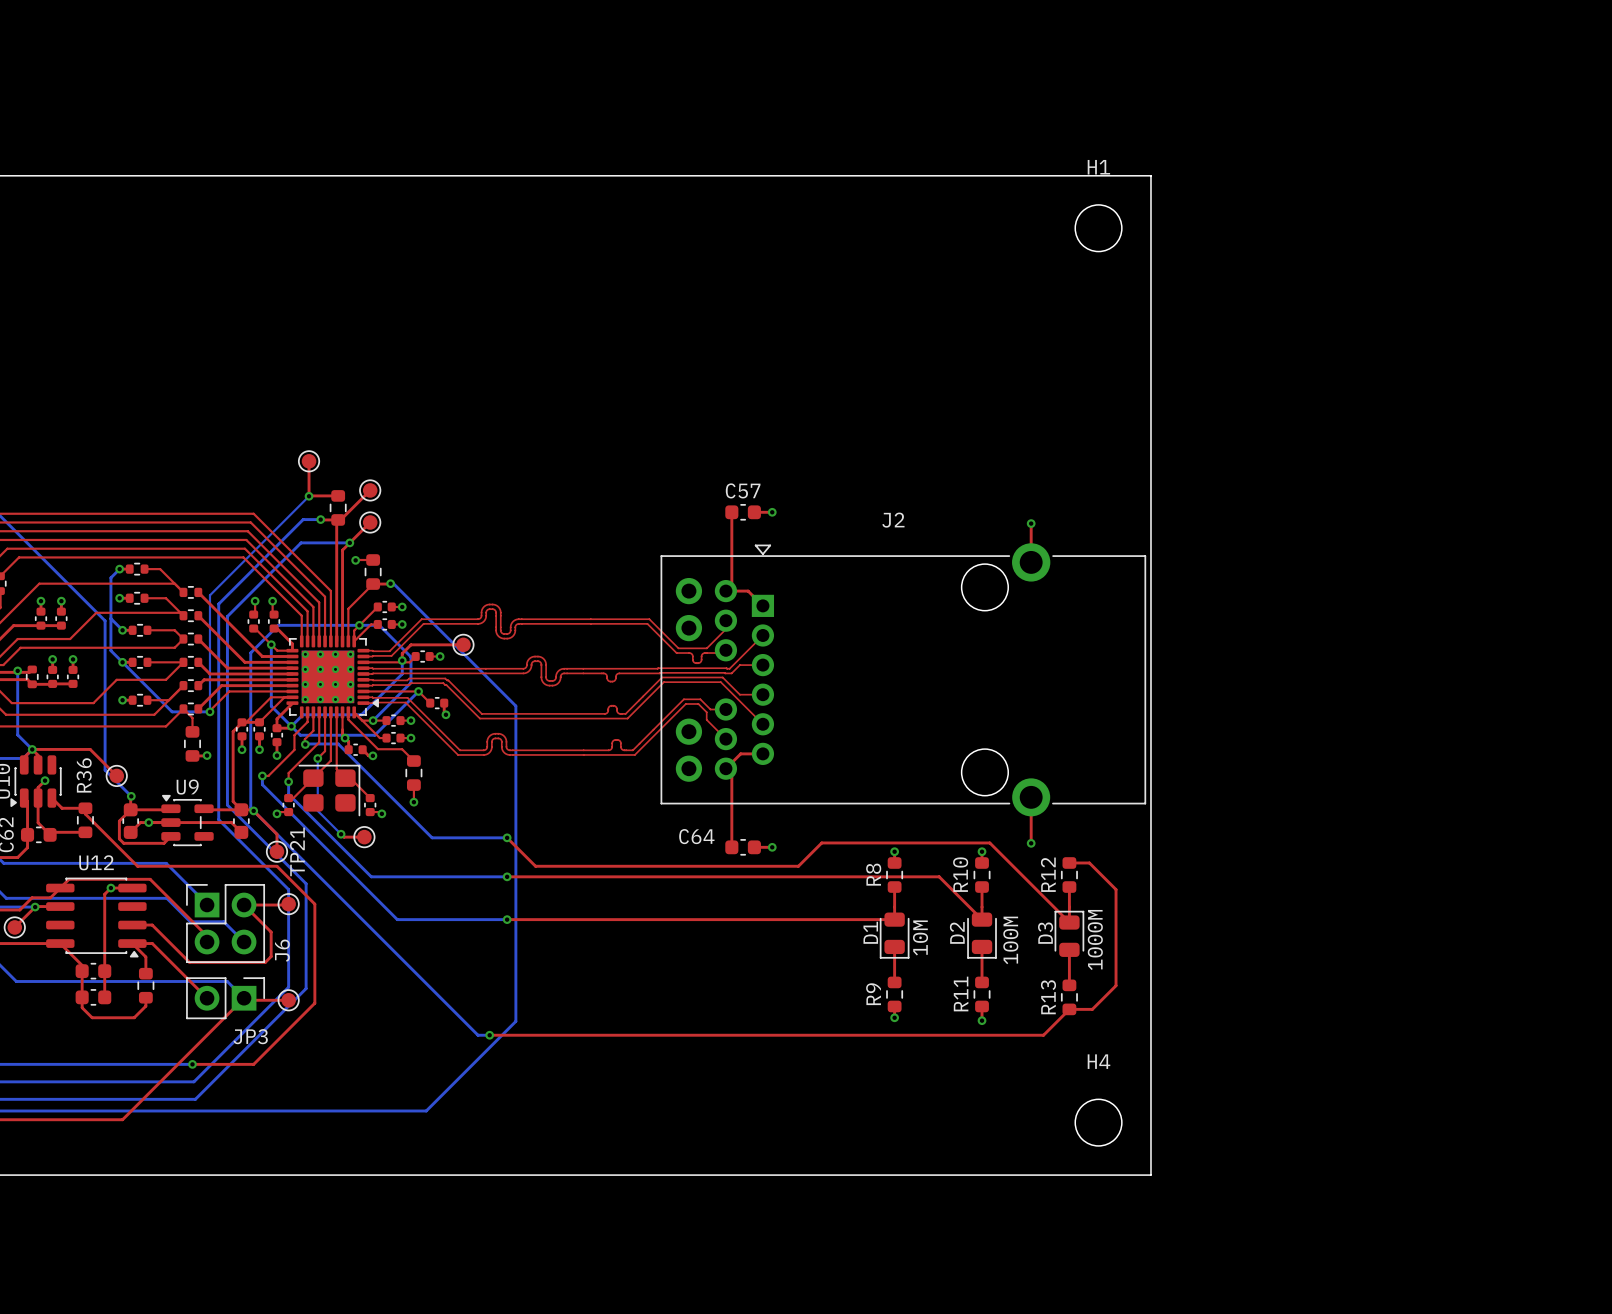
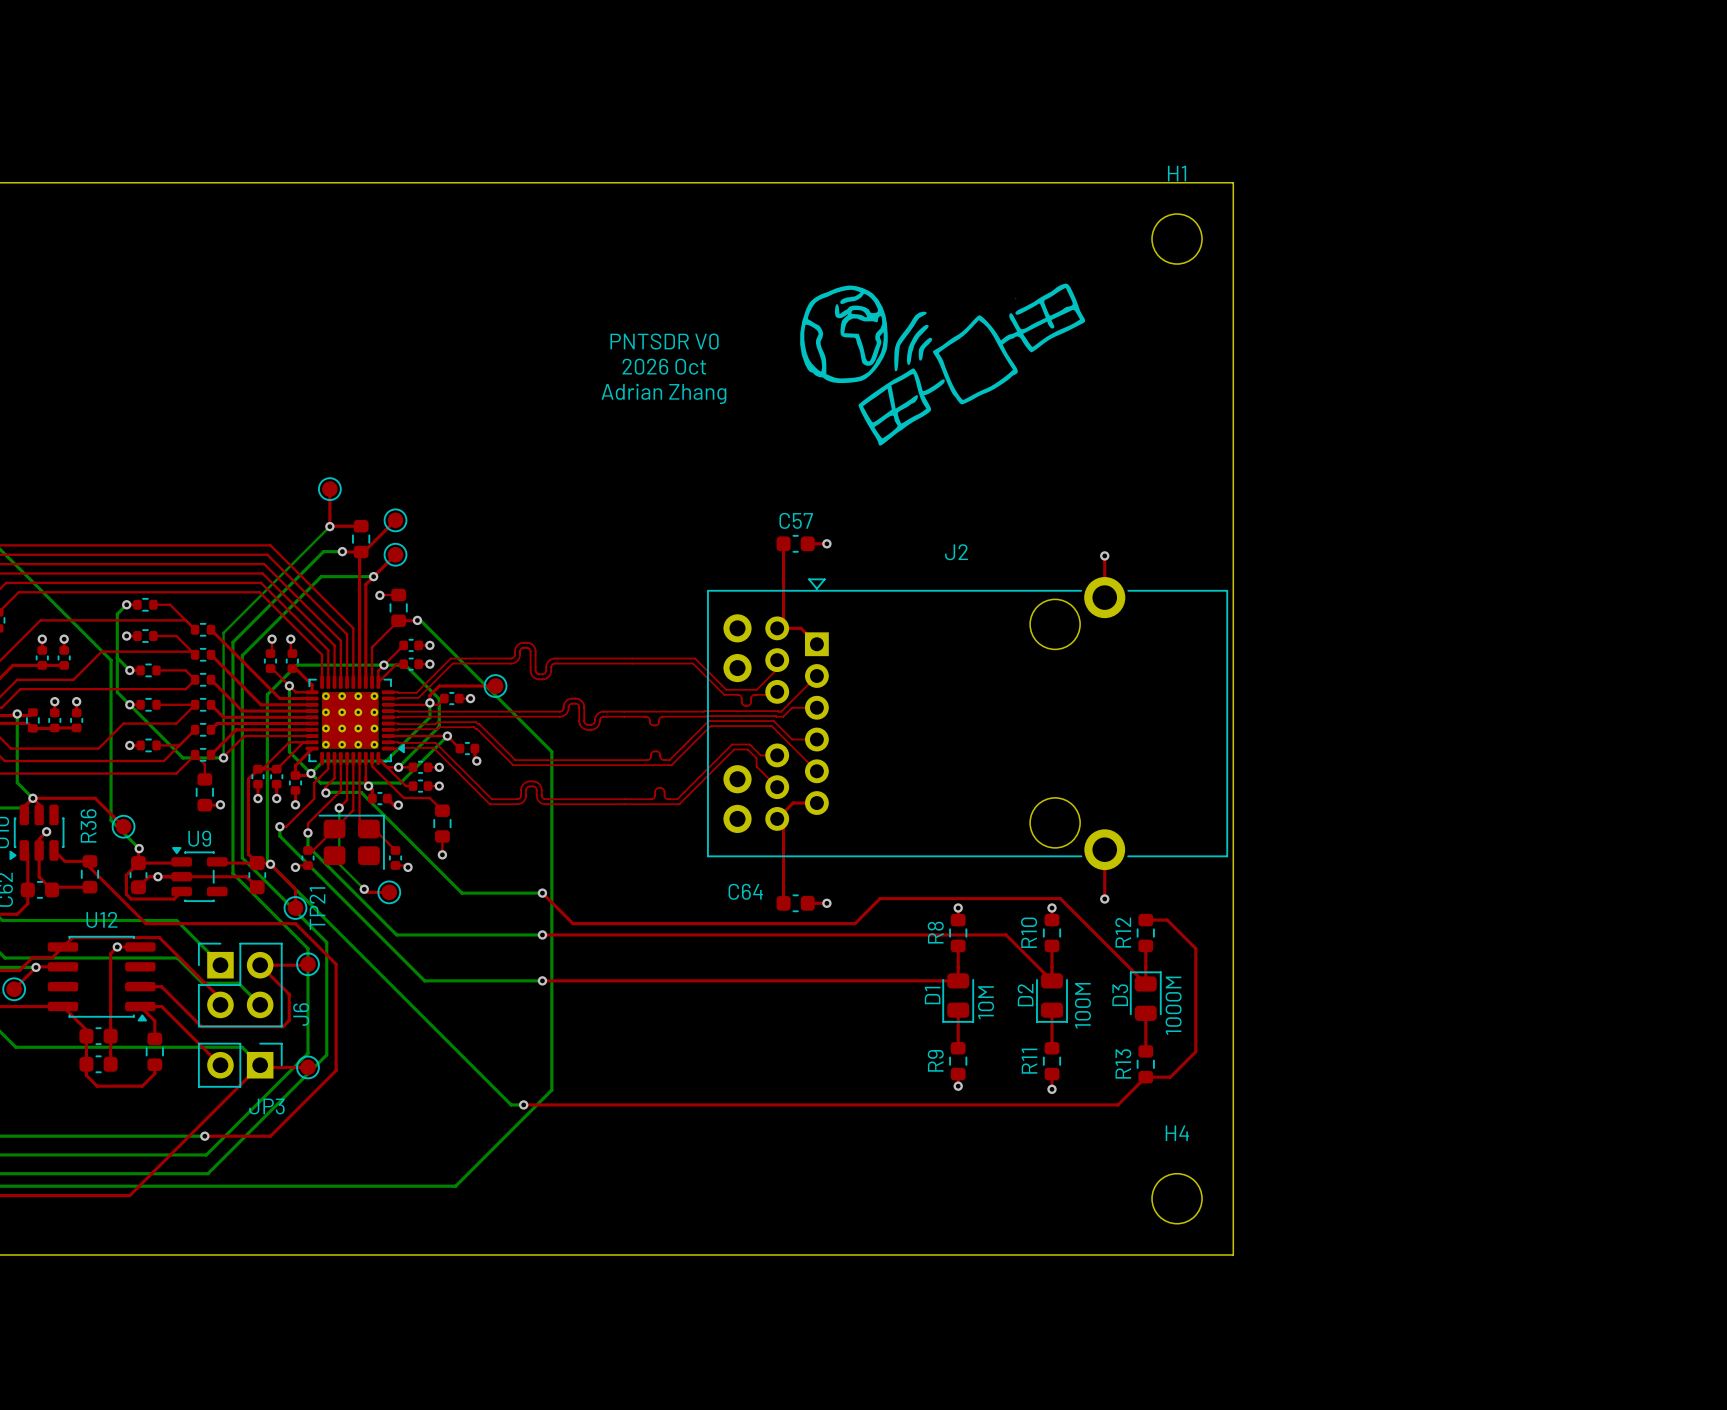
drawing: none -> [800, 283, 1086, 446]
text: none -> PNTSDR V0 (664, 341)
text: none -> 2026 Oct (664, 366)
text: none -> Adrian Zhang (663, 393)

